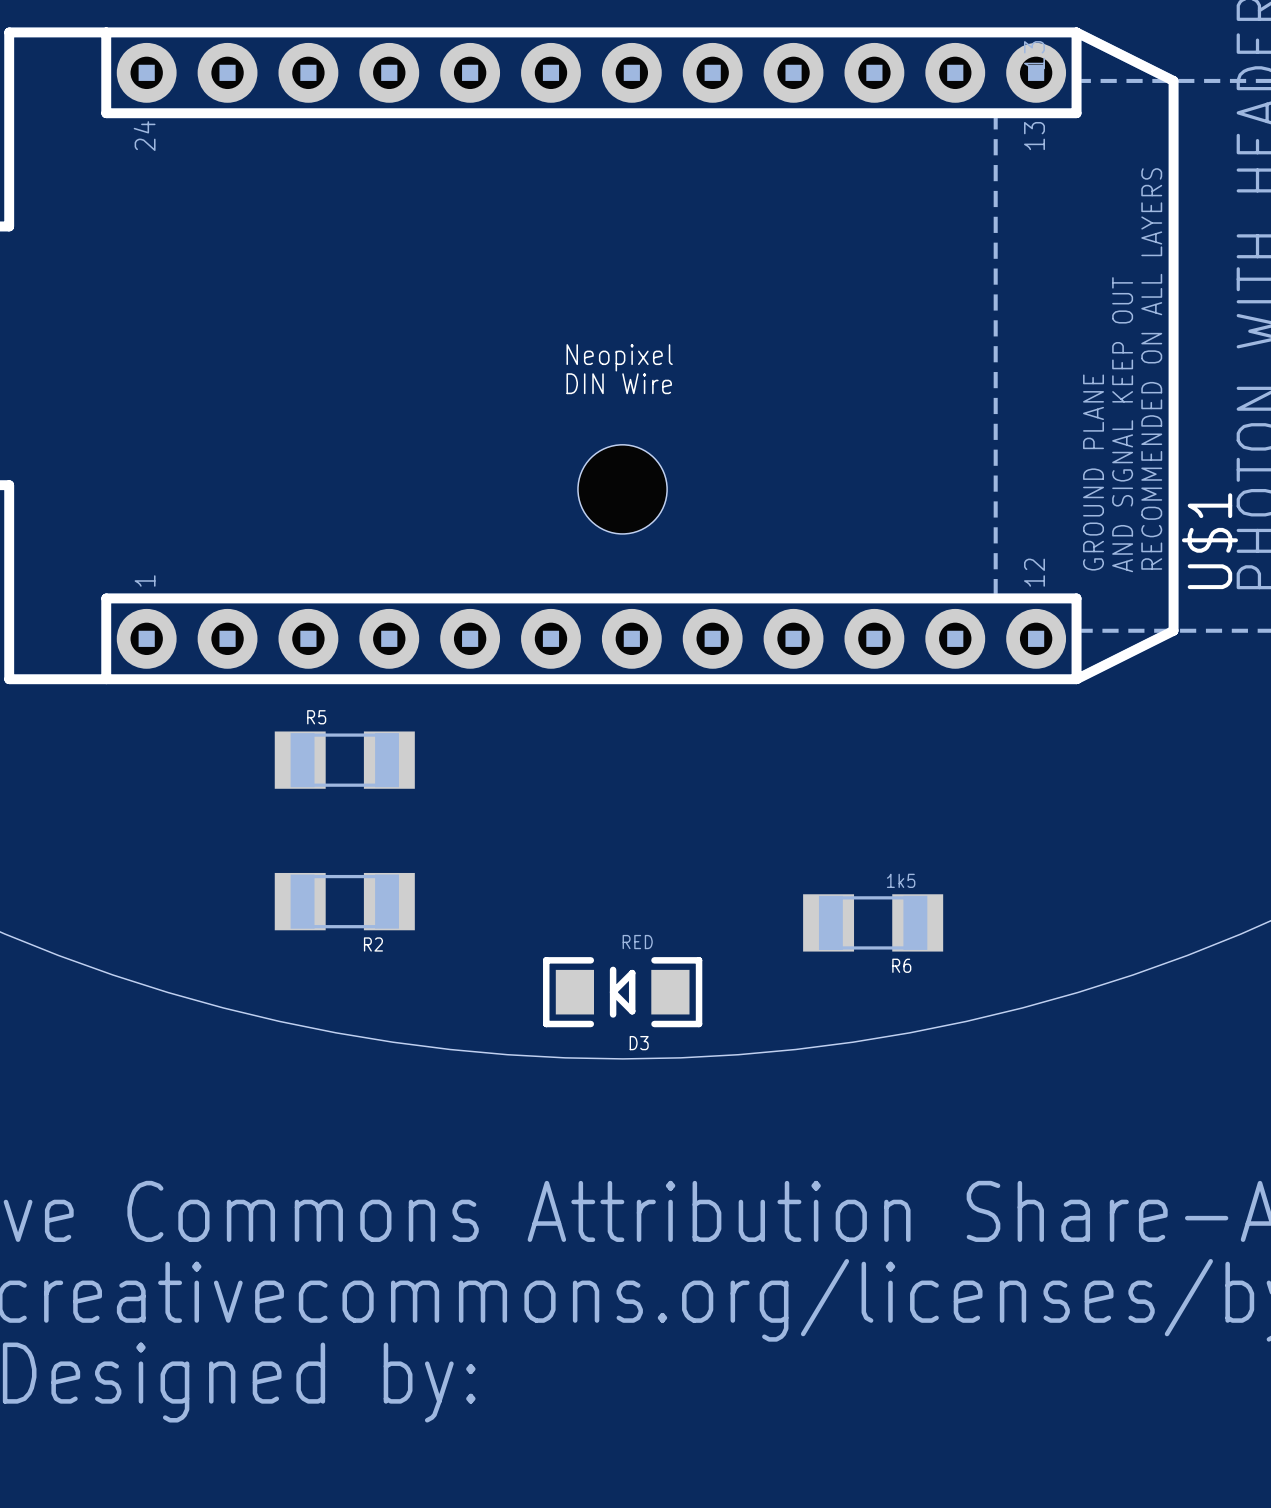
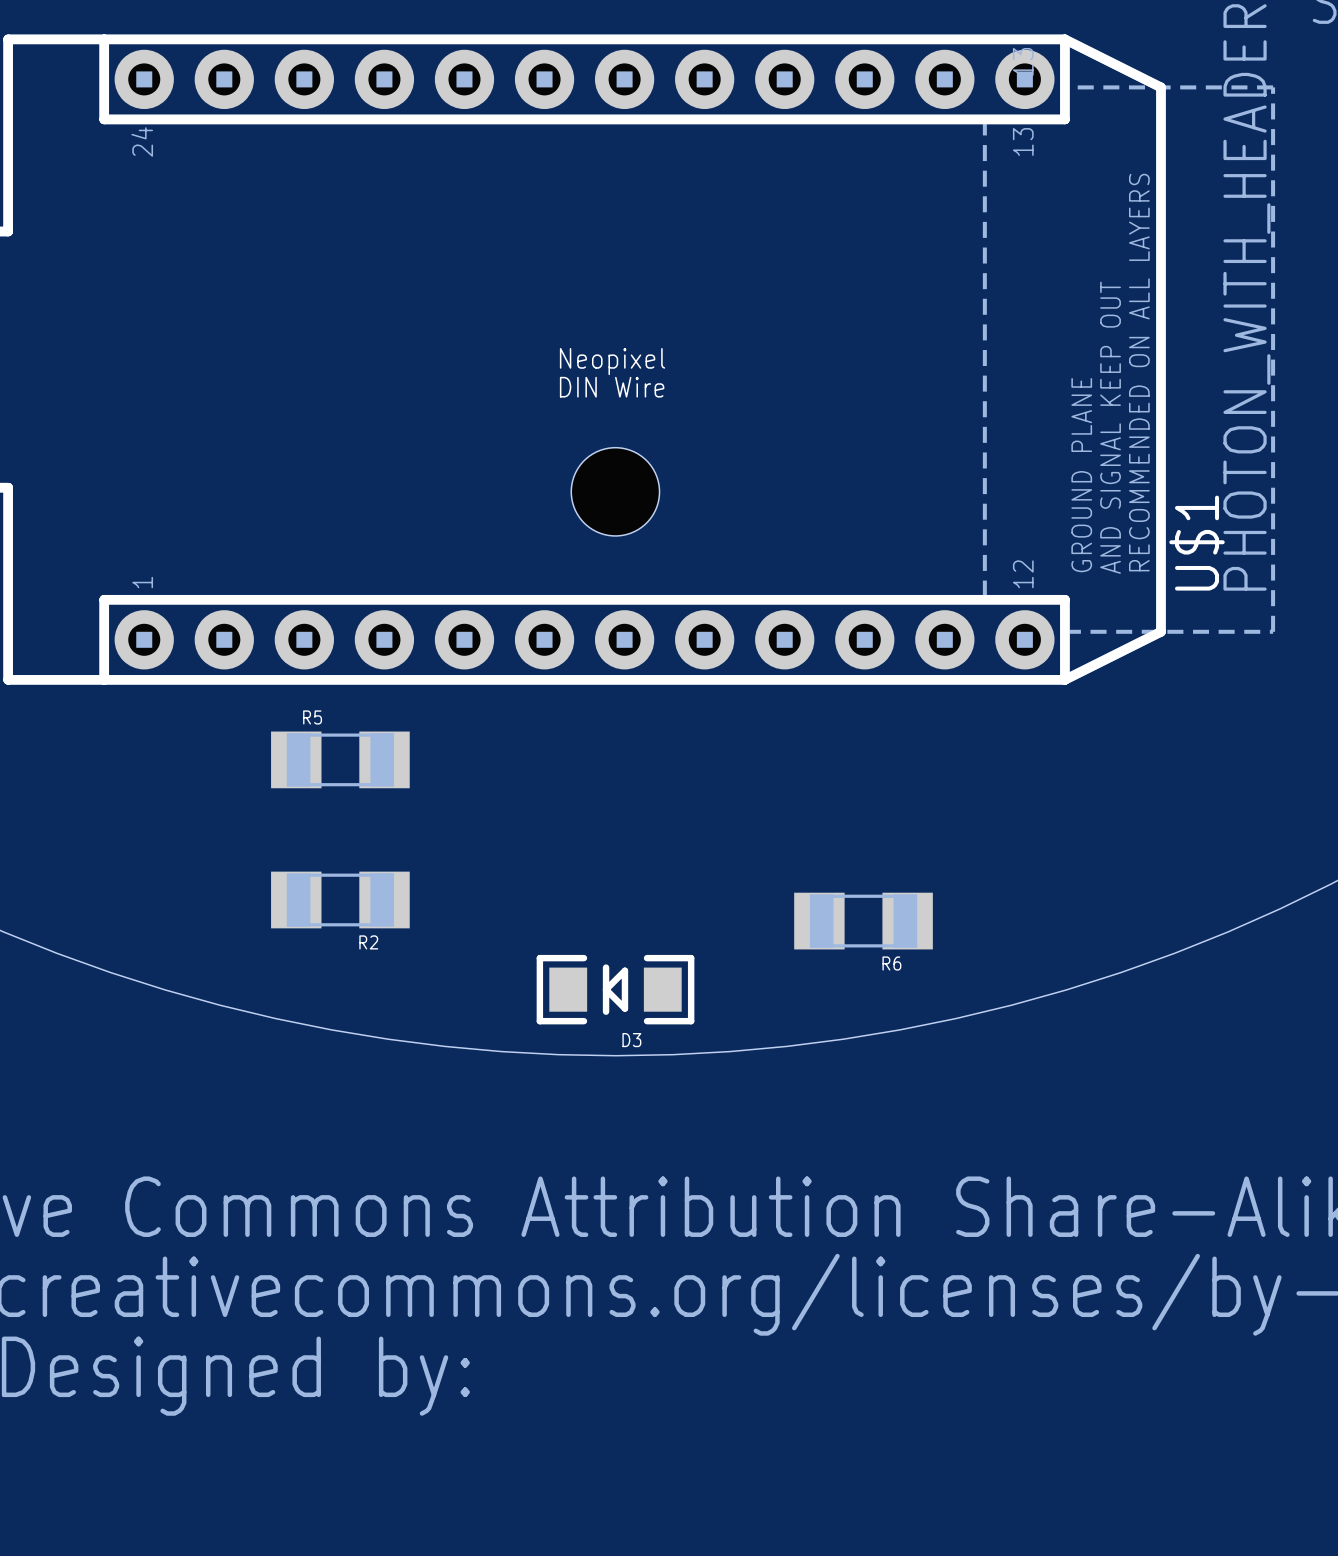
R6 value: 1k5 (901, 880) -> none
D3 value: RED (637, 942) -> none

